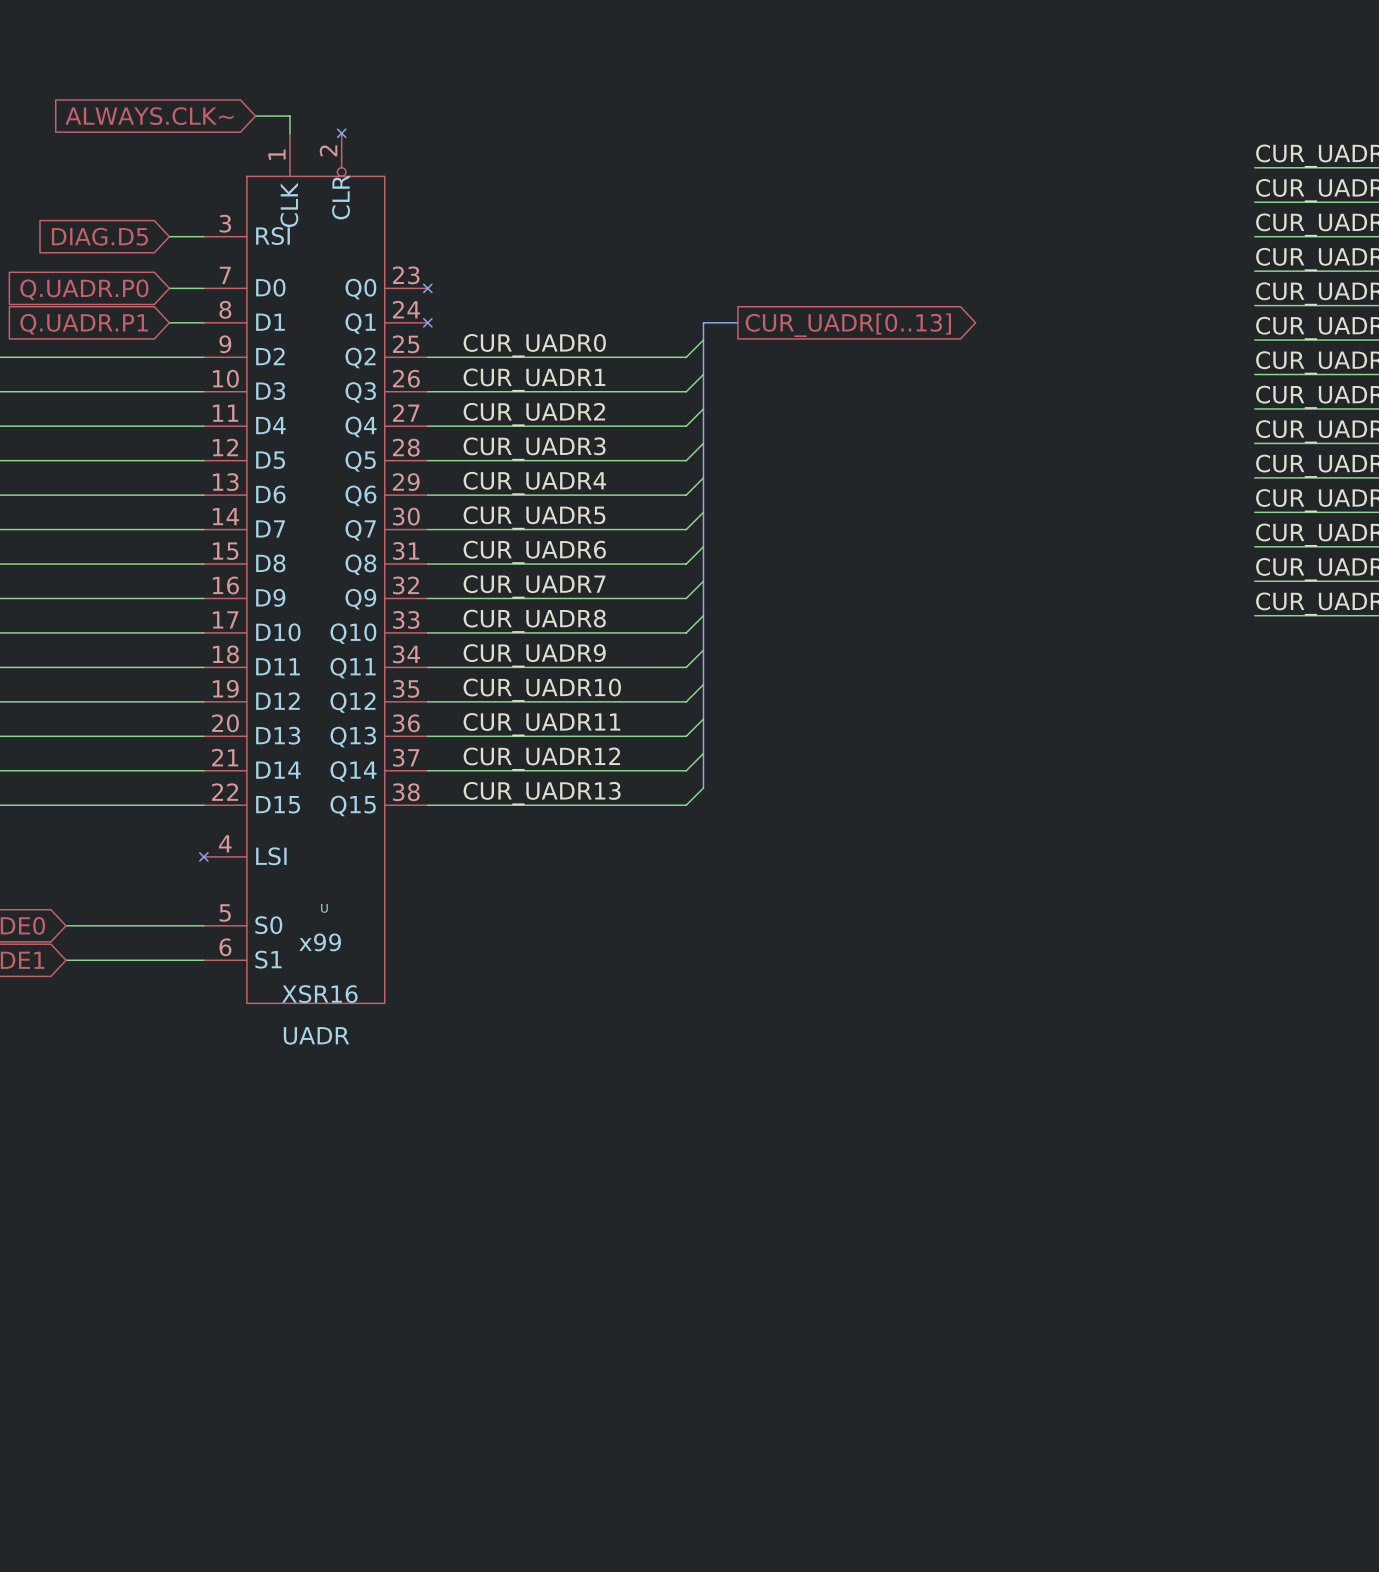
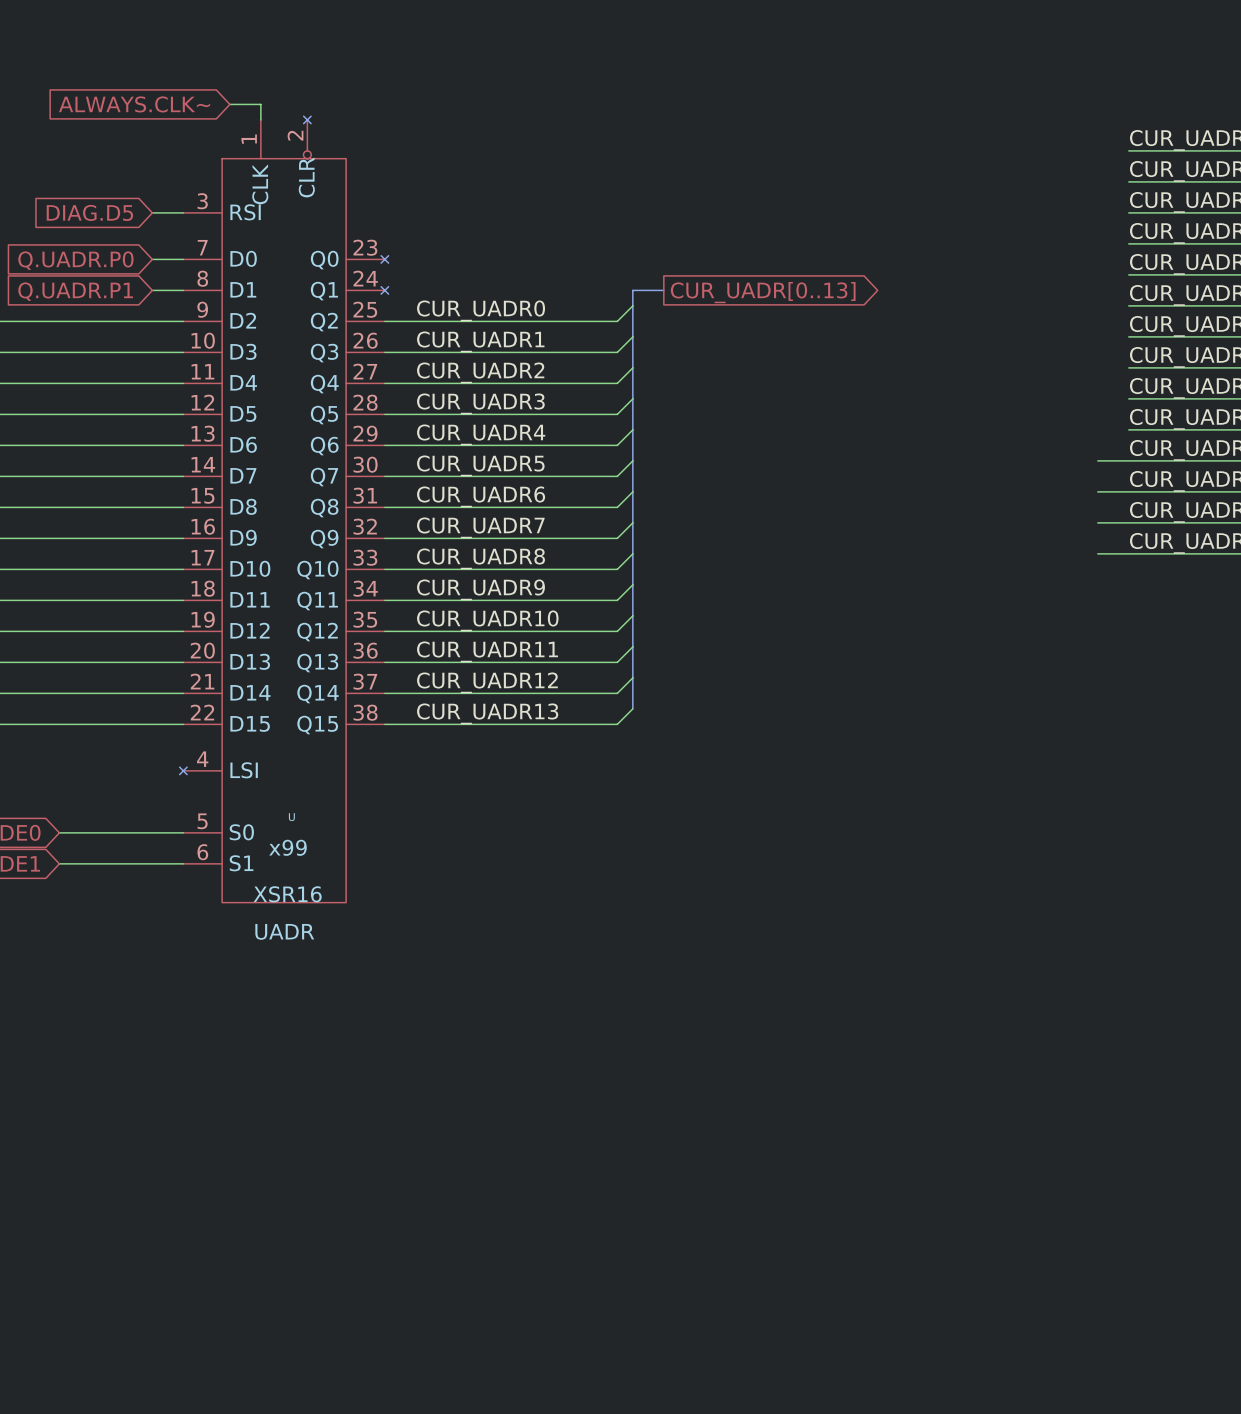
wire: none -> (1097, 460) (1128, 460)
wire: none -> (1097, 491) (1128, 491)
wire: none -> (1097, 522) (1128, 522)
wire: none -> (1097, 553) (1128, 553)

